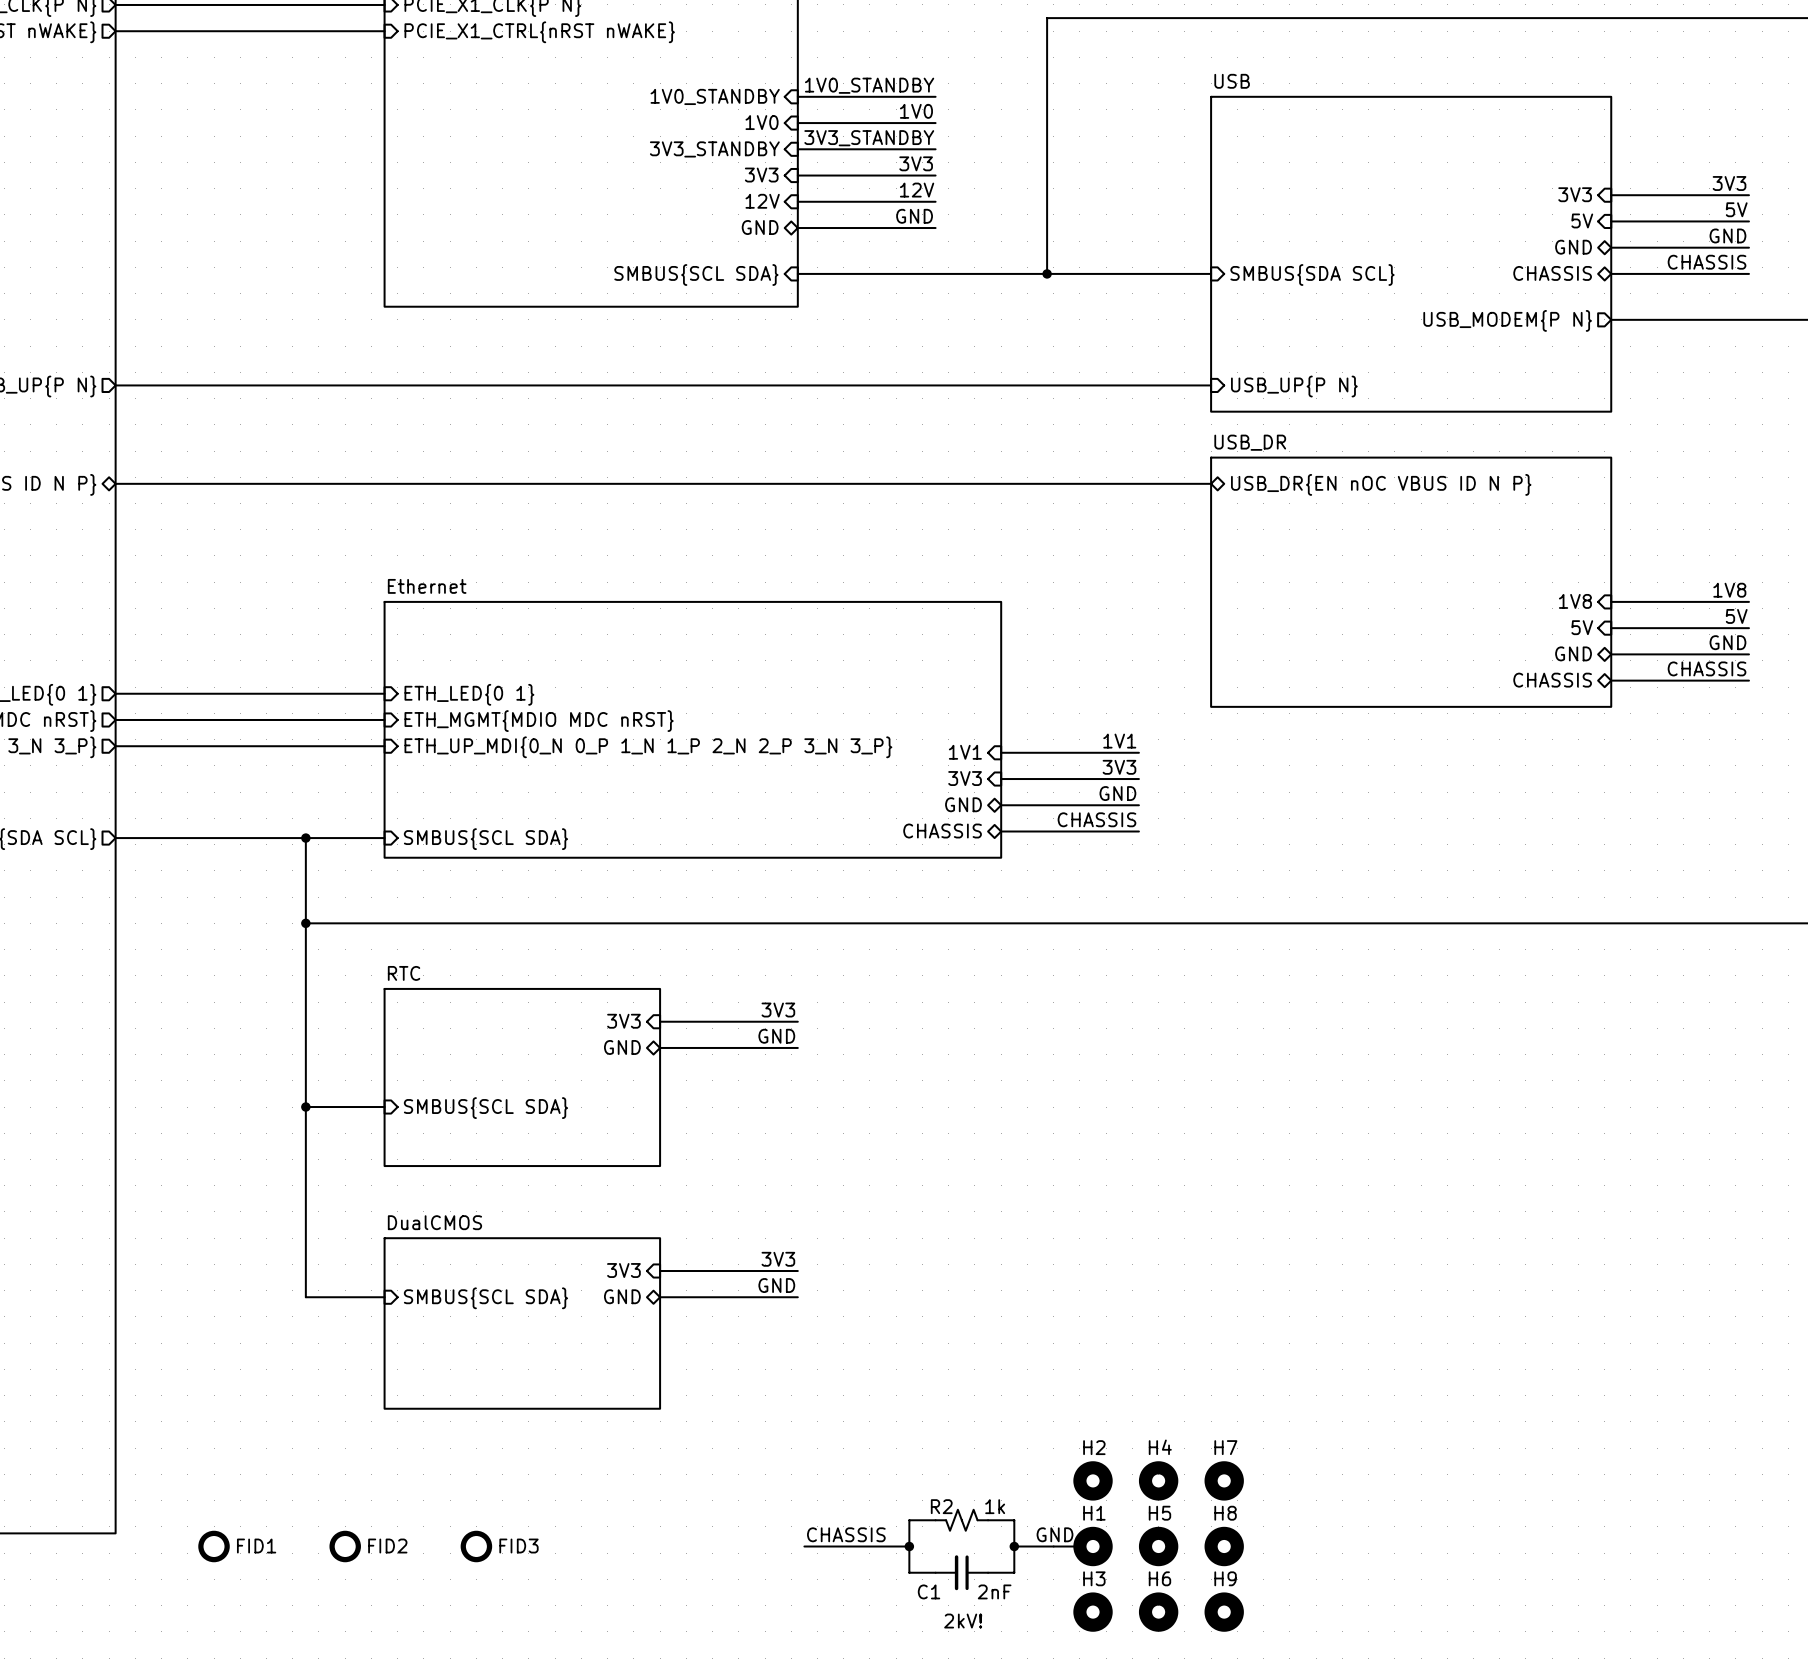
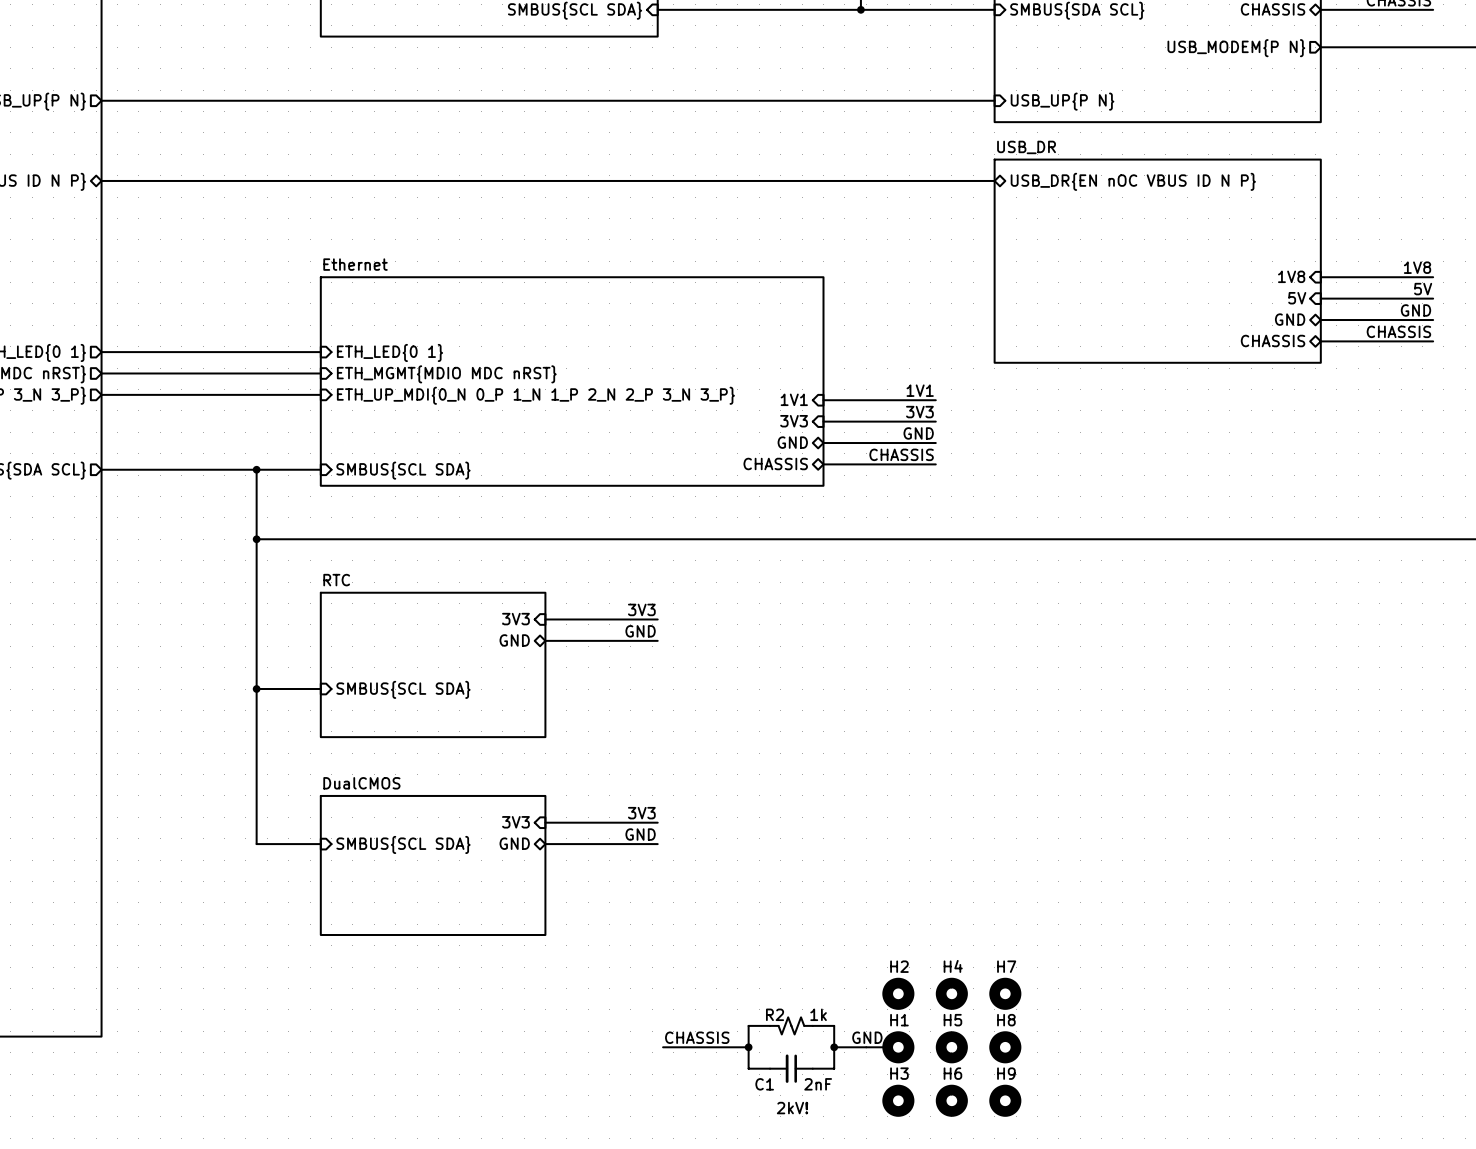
FID1: (214, 1546) -> none
FID2: (345, 1546) -> none
FID3: (476, 1546) -> none

